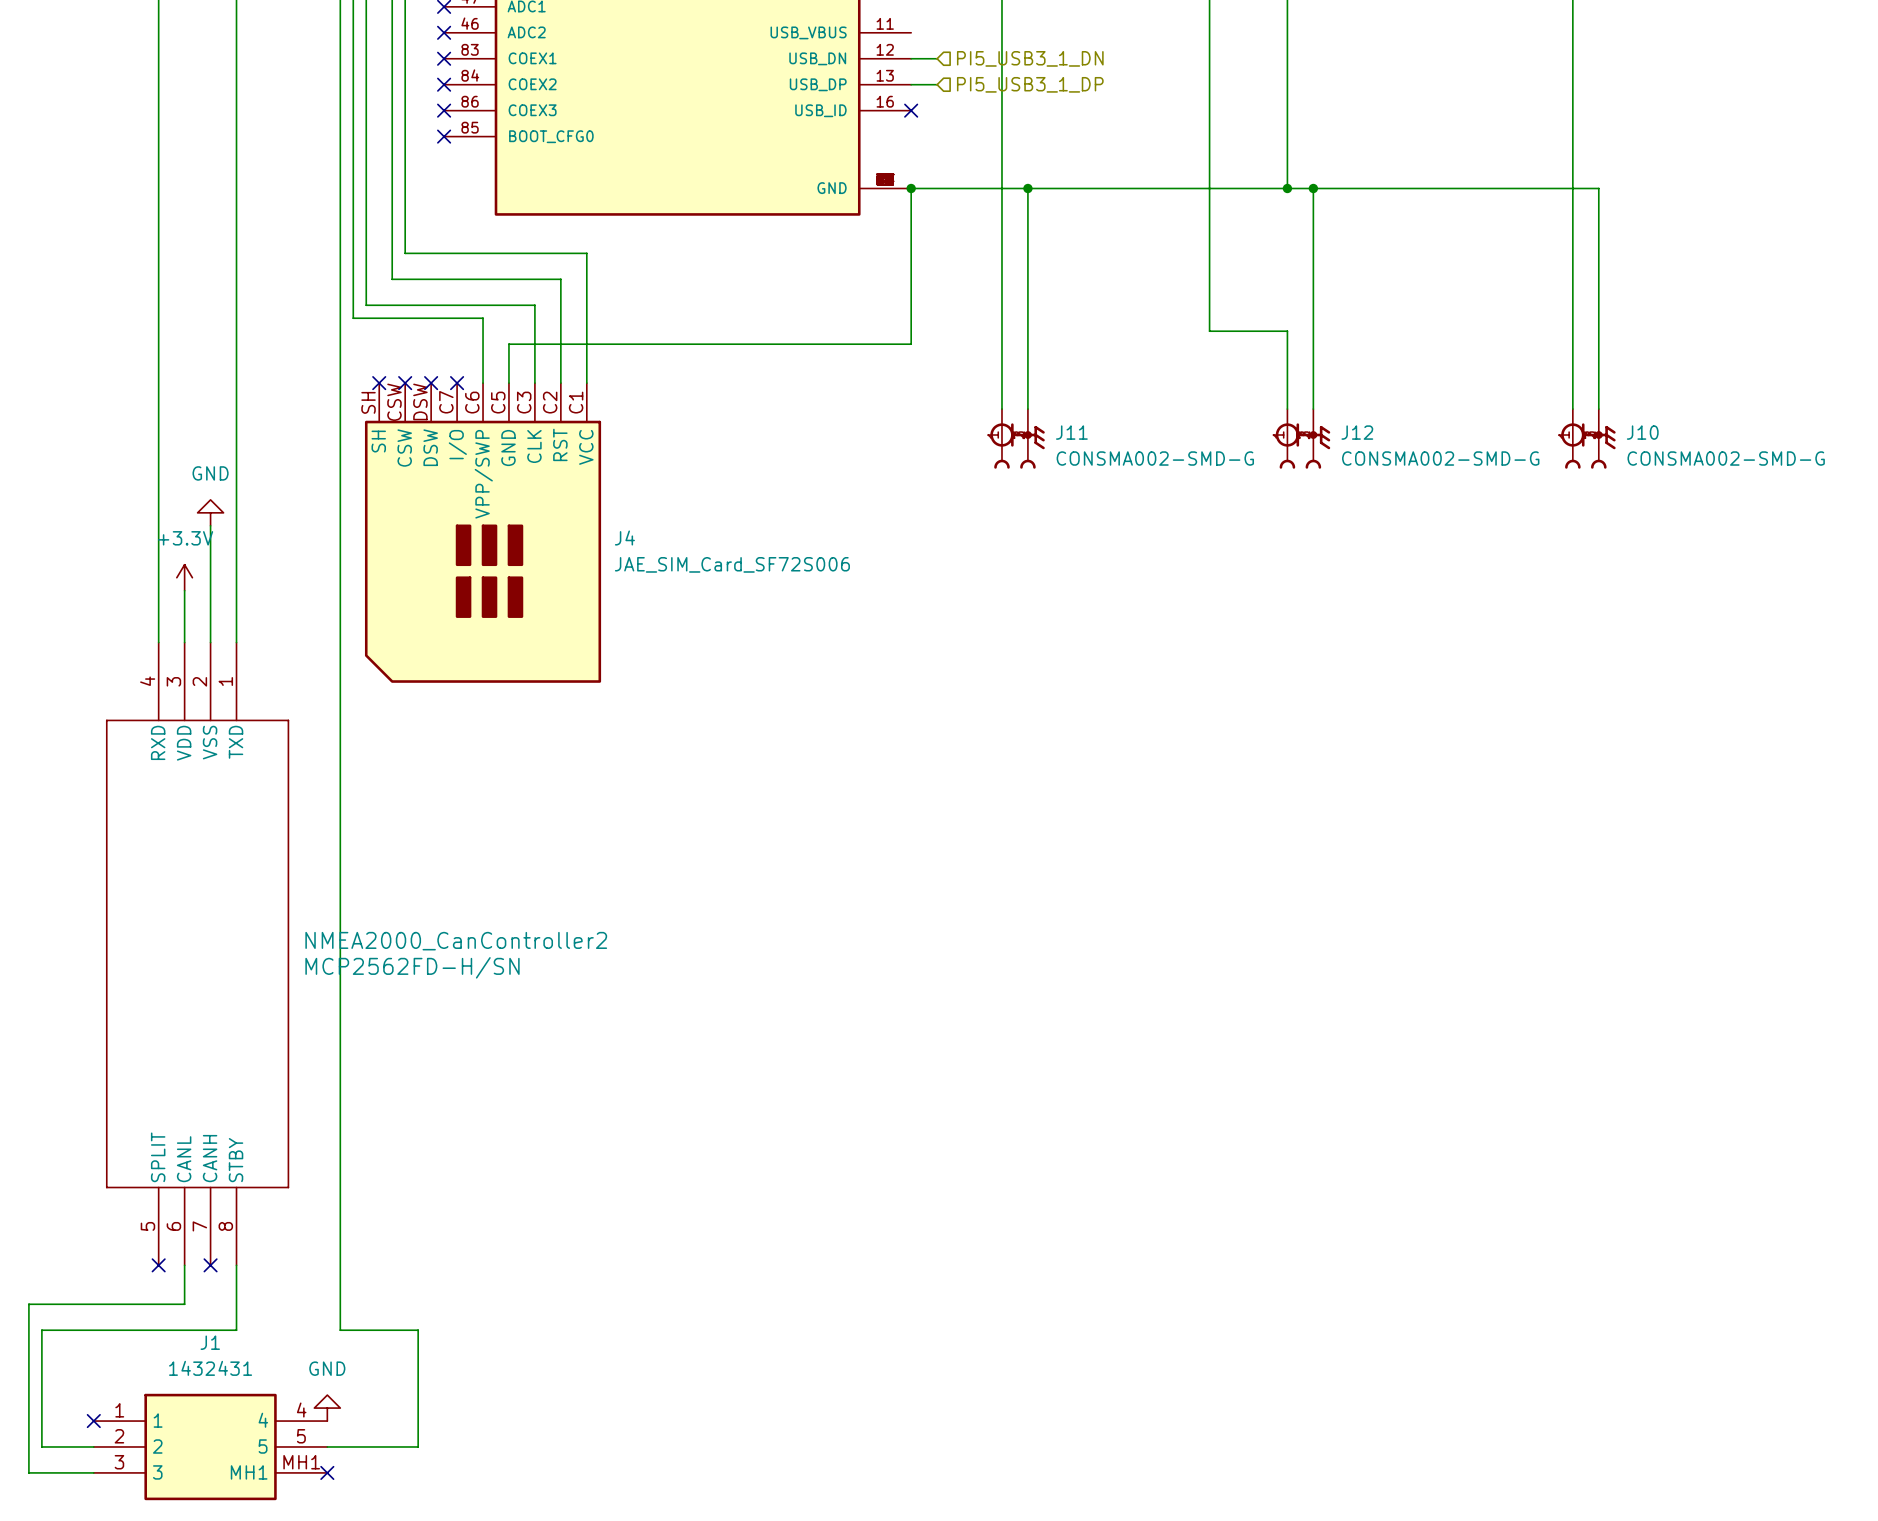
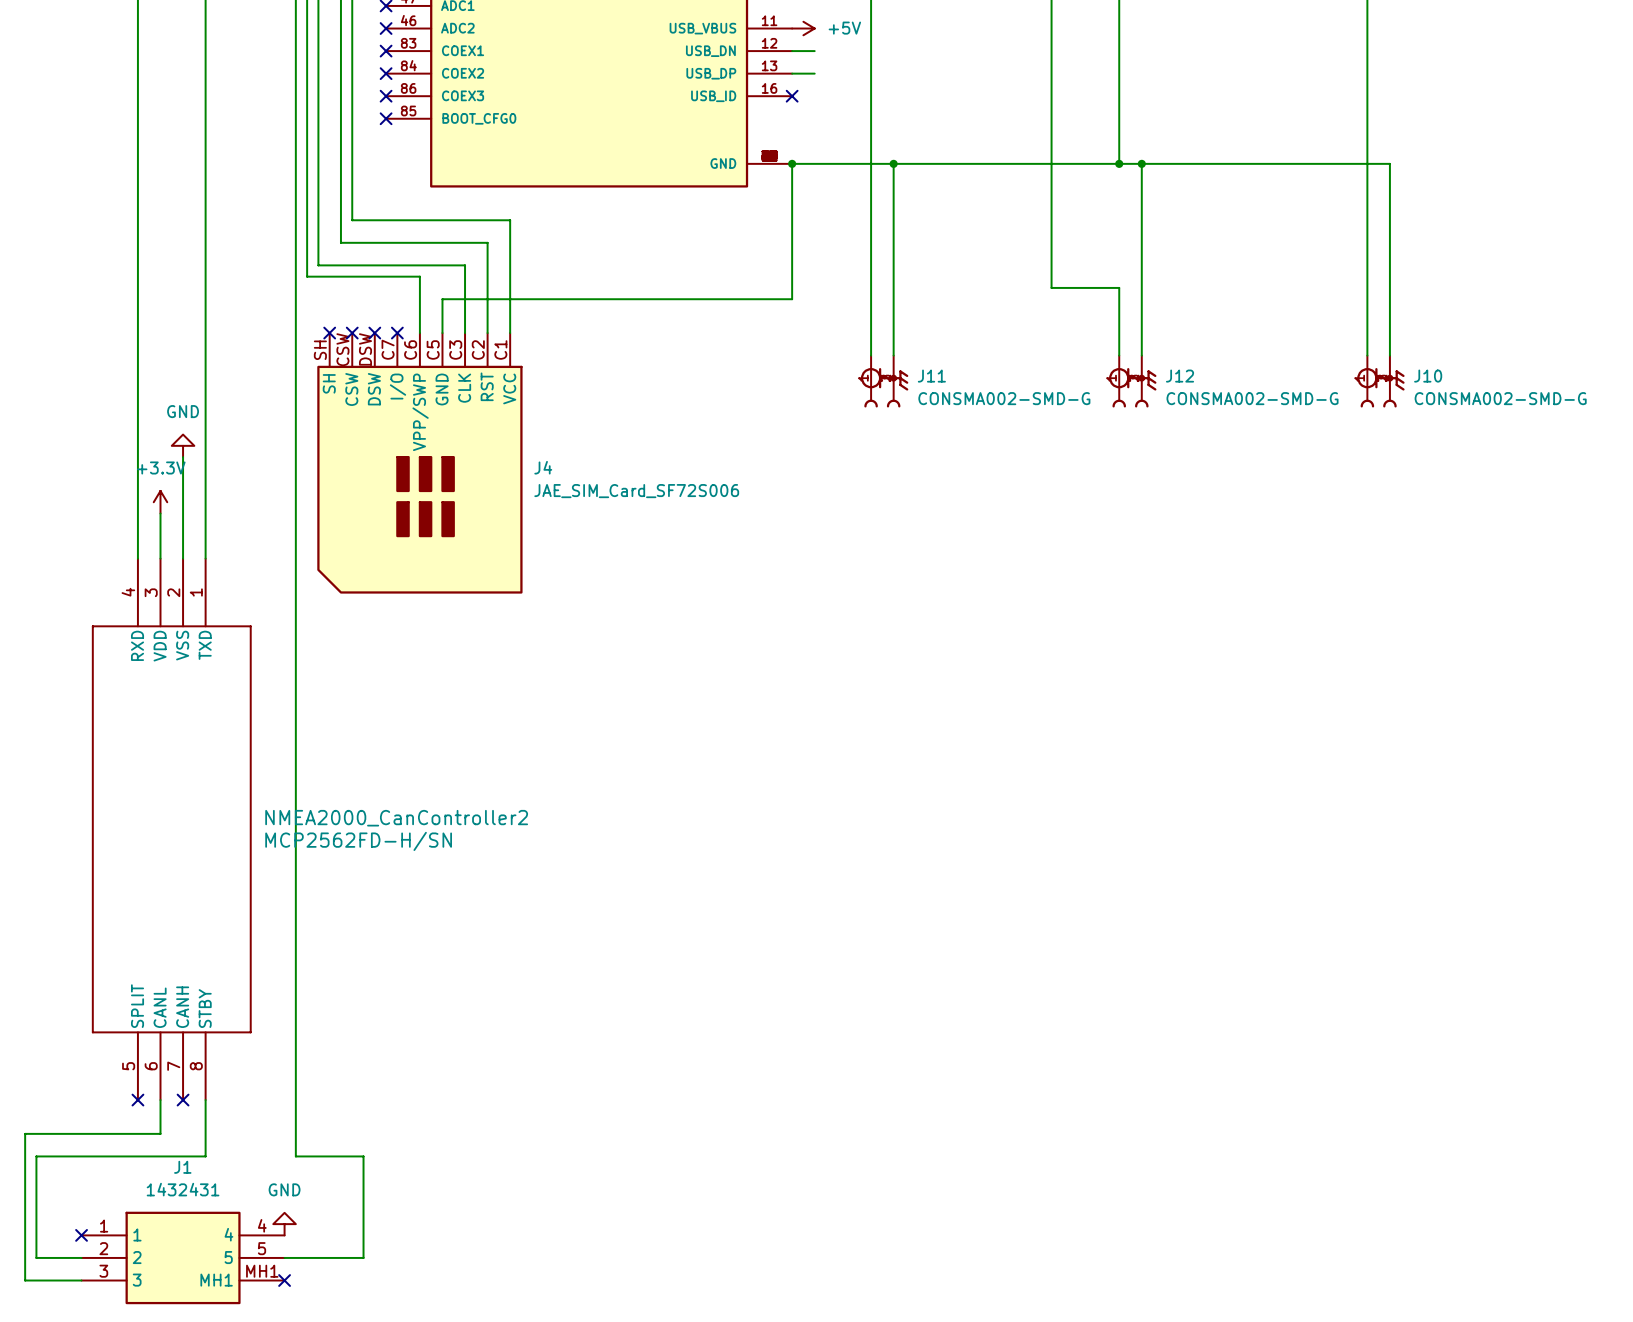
power symbol: none -> +5V (803, 28)
hierarchical label: PI5_USB3_1_DN (1030, 58) -> none
hierarchical label: PI5_USB3_1_DP (1030, 84) -> none

